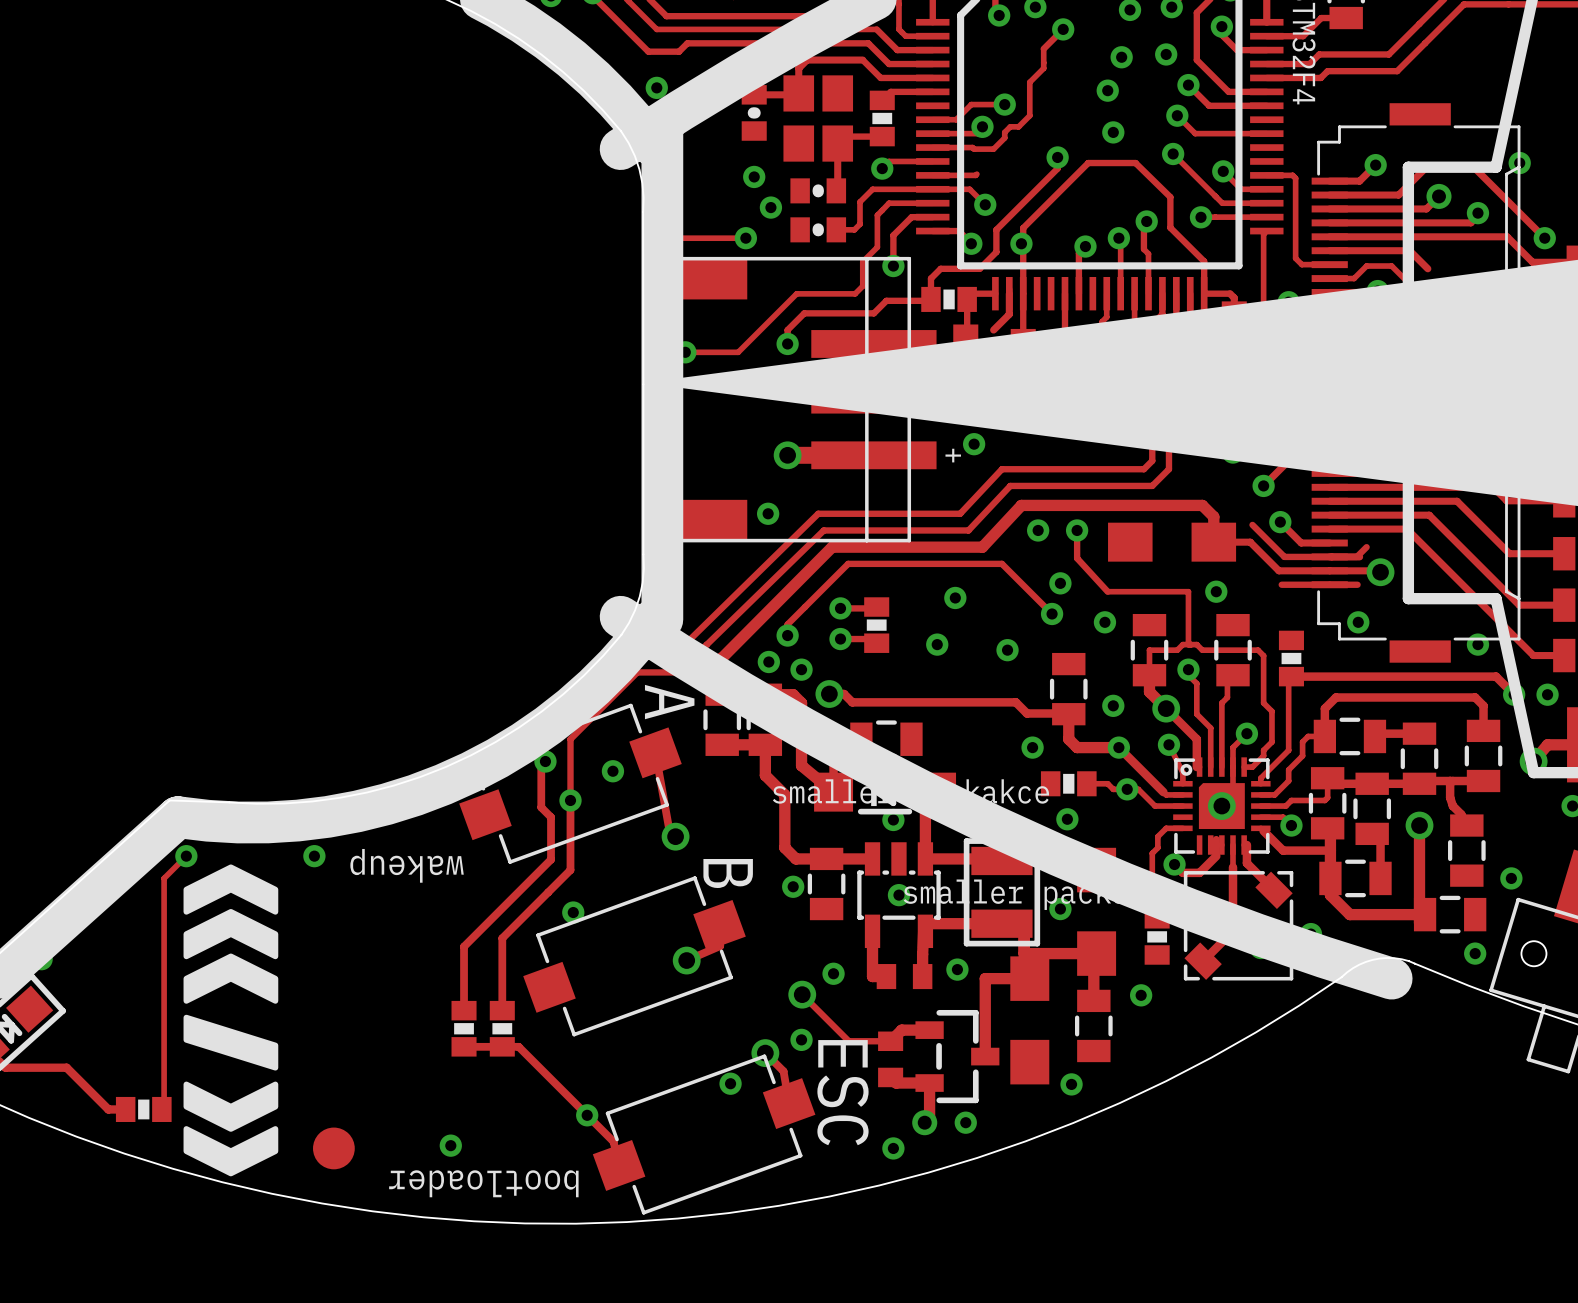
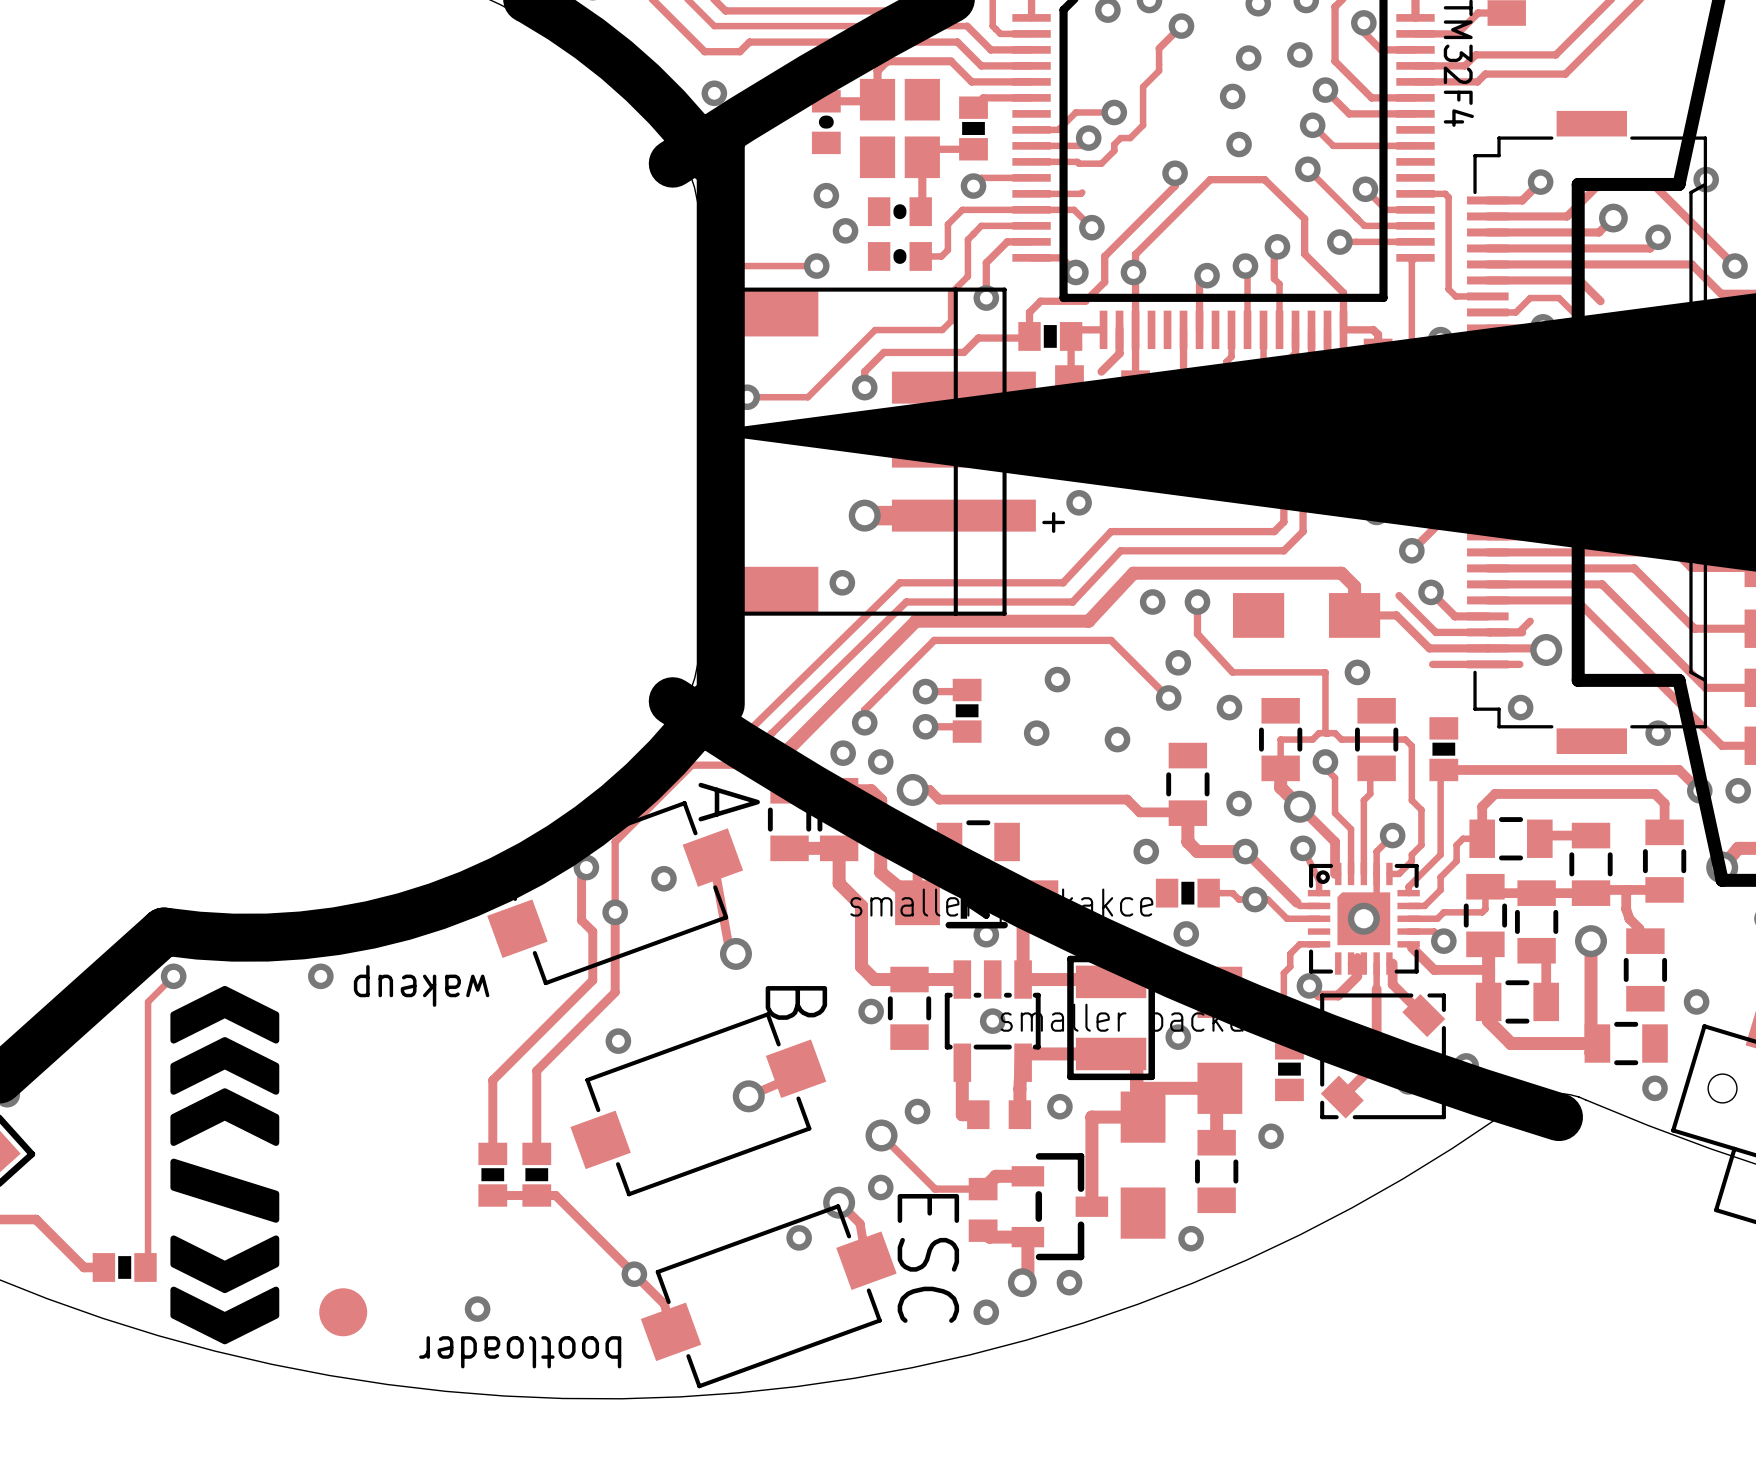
part position: (634, 956) -> (698, 1104)

